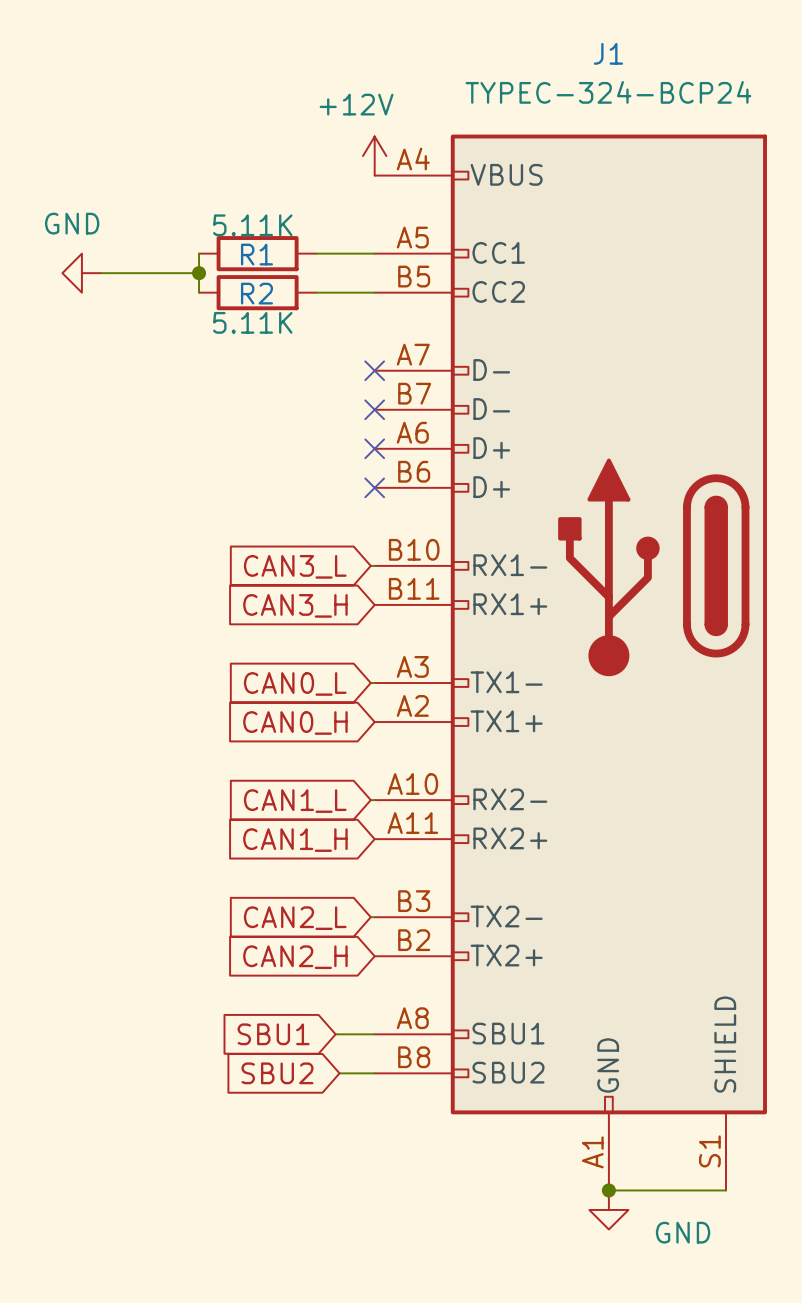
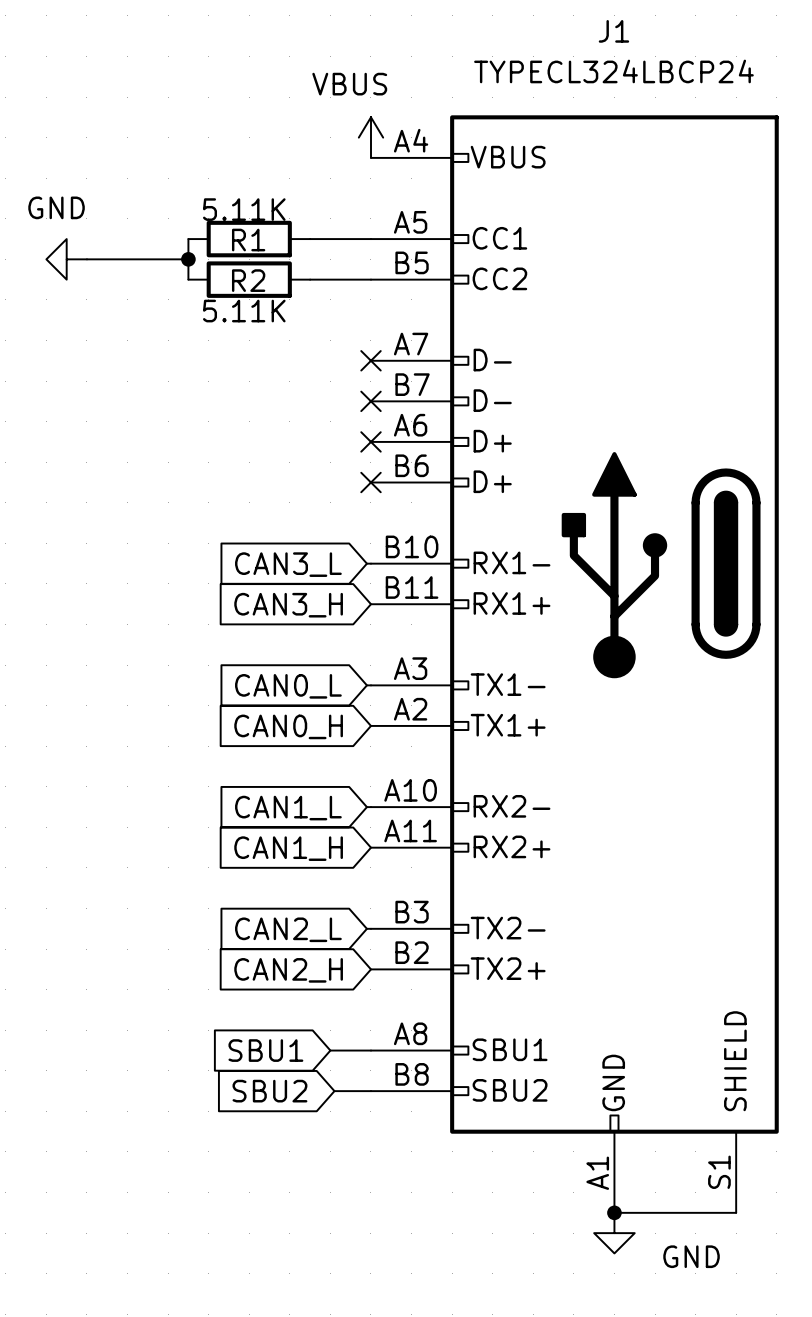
J1 value: TYPEC-324-BCP24 (608, 92) -> TYPECL324LBCP24 (613, 71)
power symbol: +12V (374, 156) -> VBUS (370, 137)

